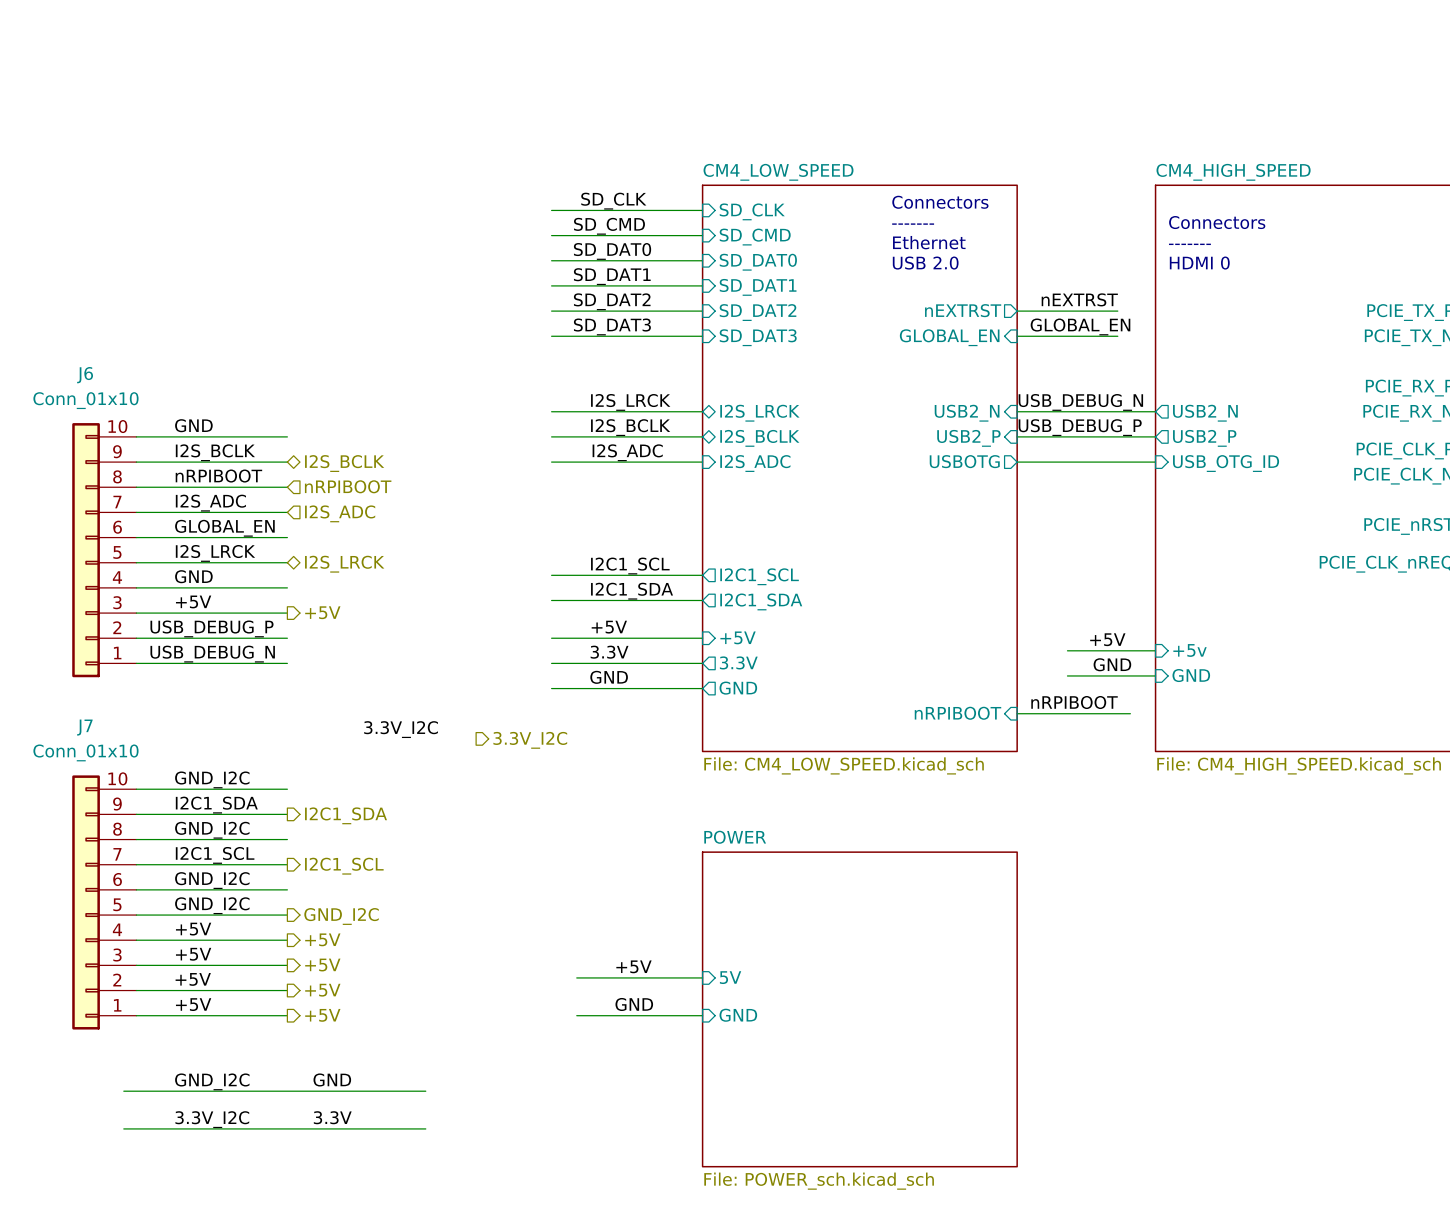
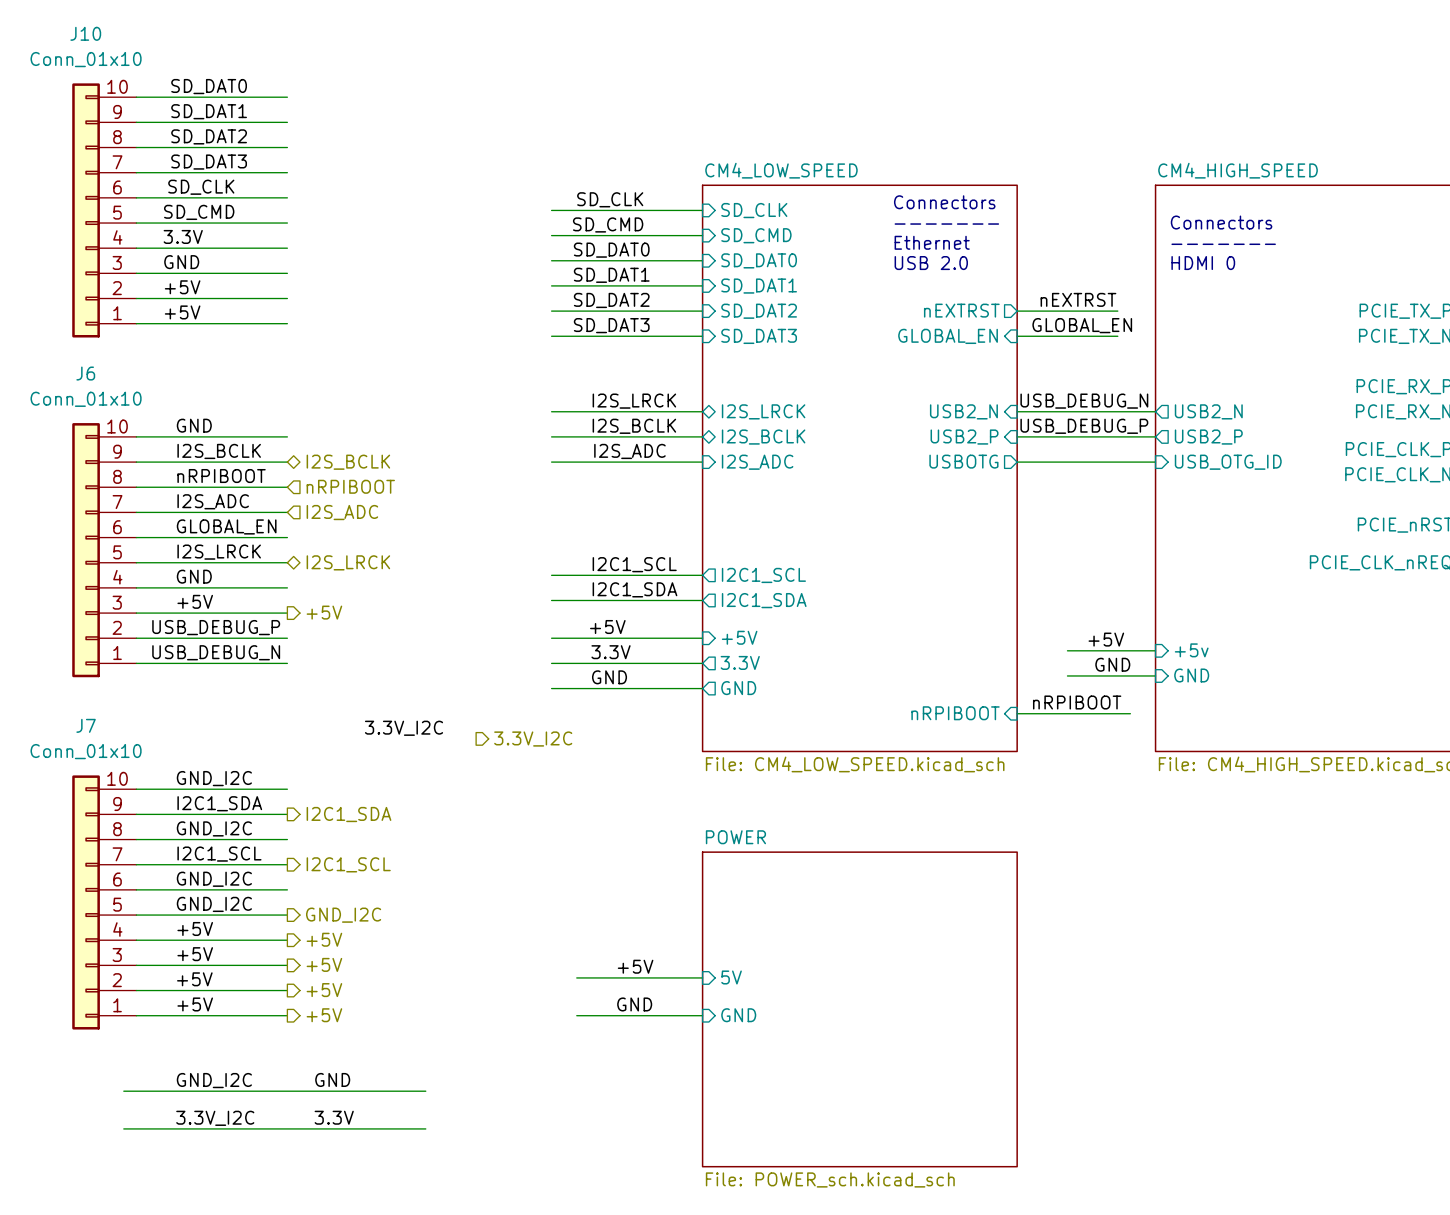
label: none -> SD_DAT0 (209, 86)
wire: none -> (136, 97) (287, 97)
label: none -> SD_DAT1 (209, 111)
wire: none -> (136, 122) (287, 122)
label: none -> SD_DAT2 (209, 136)
wire: none -> (136, 147) (287, 147)
label: none -> SD_DAT3 (209, 162)
wire: none -> (136, 172) (287, 172)
label: none -> SD_CLK (201, 187)
wire: none -> (136, 197) (287, 197)
J10: none -> Conn_01x10 (104, 210)
label: none -> SD_CMD (199, 212)
wire: none -> (136, 223) (287, 223)
label: none -> 3.3V (183, 236)
wire: none -> (136, 248) (287, 248)
label: none -> GND (181, 262)
wire: none -> (136, 273) (287, 273)
label: none -> +5V (182, 287)
wire: none -> (136, 298) (287, 298)
label: none -> +5V (182, 312)
wire: none -> (136, 323) (287, 323)

